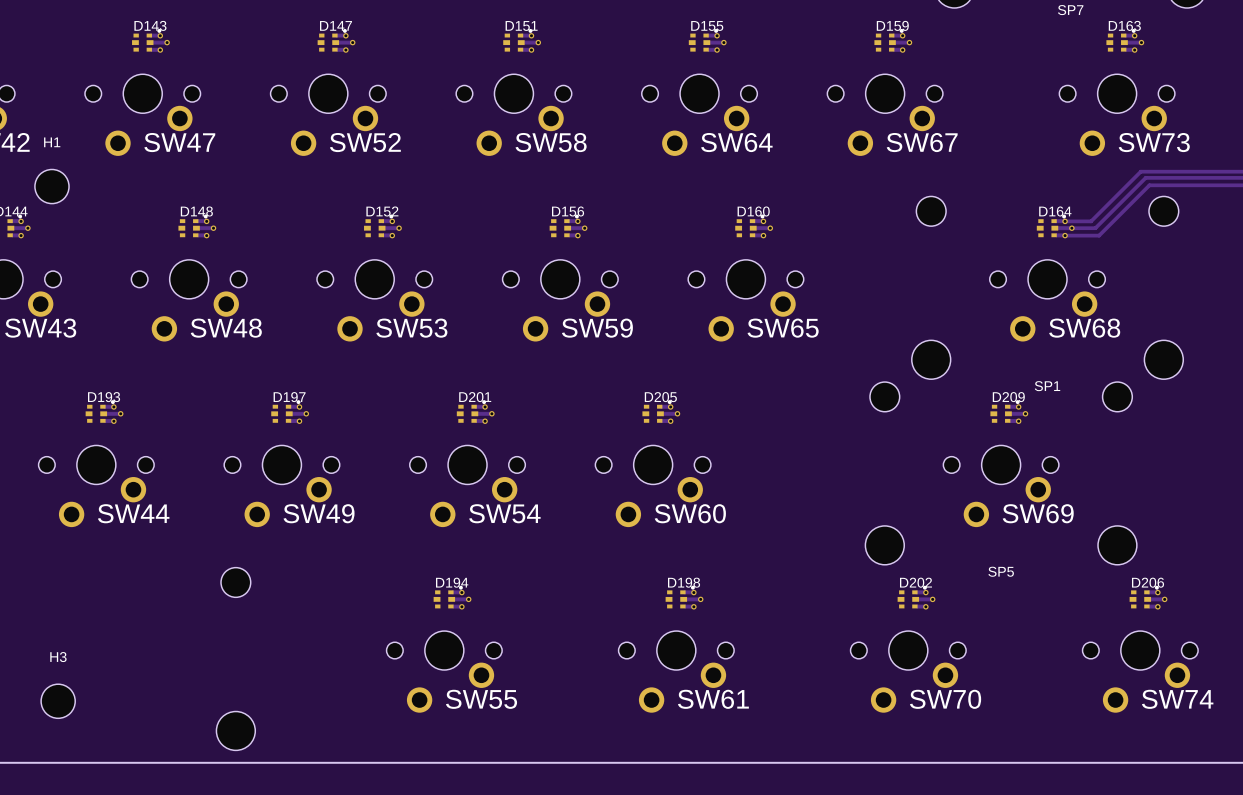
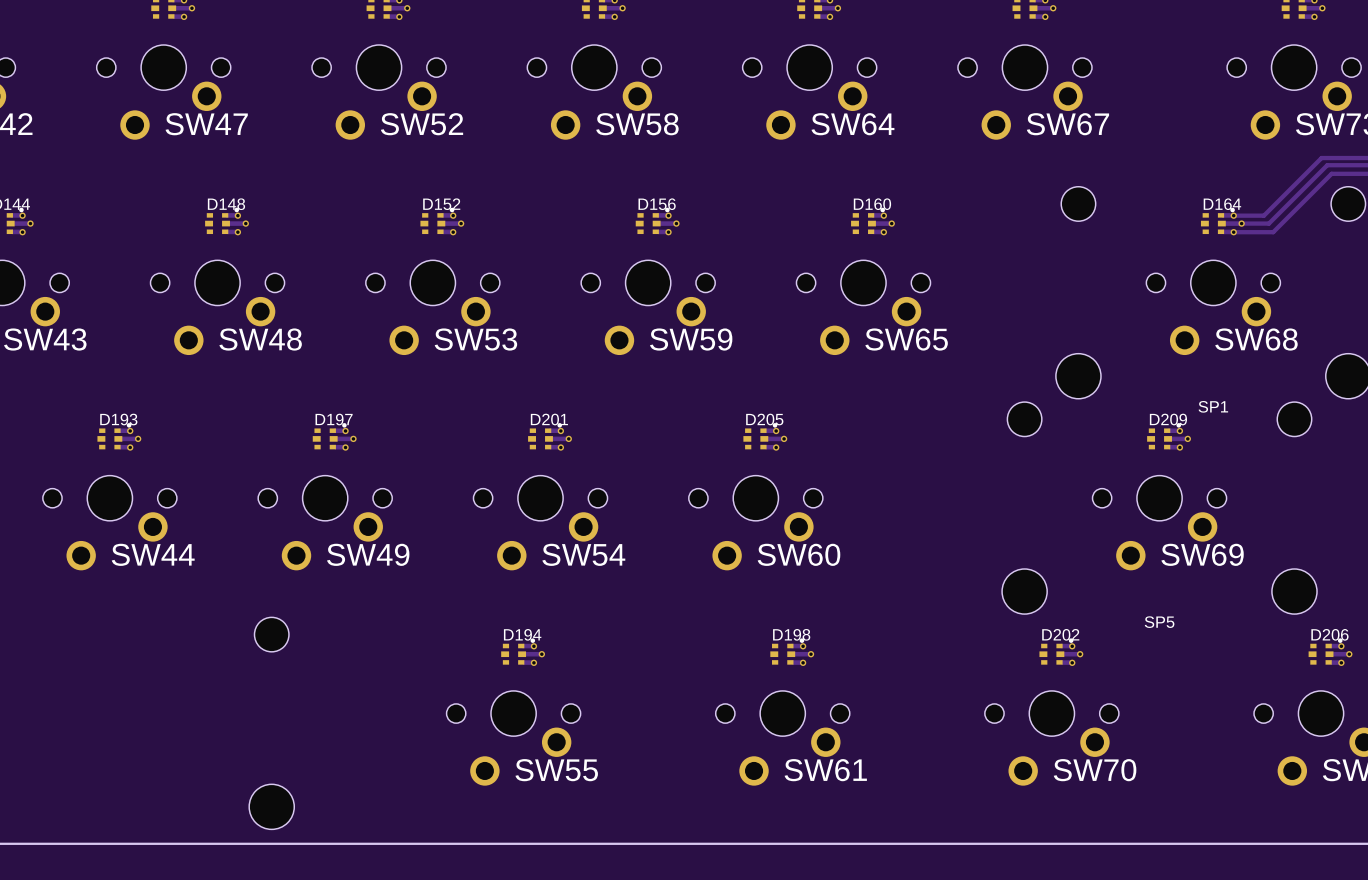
H1: (51, 186) -> none
H3: (58, 701) -> none

